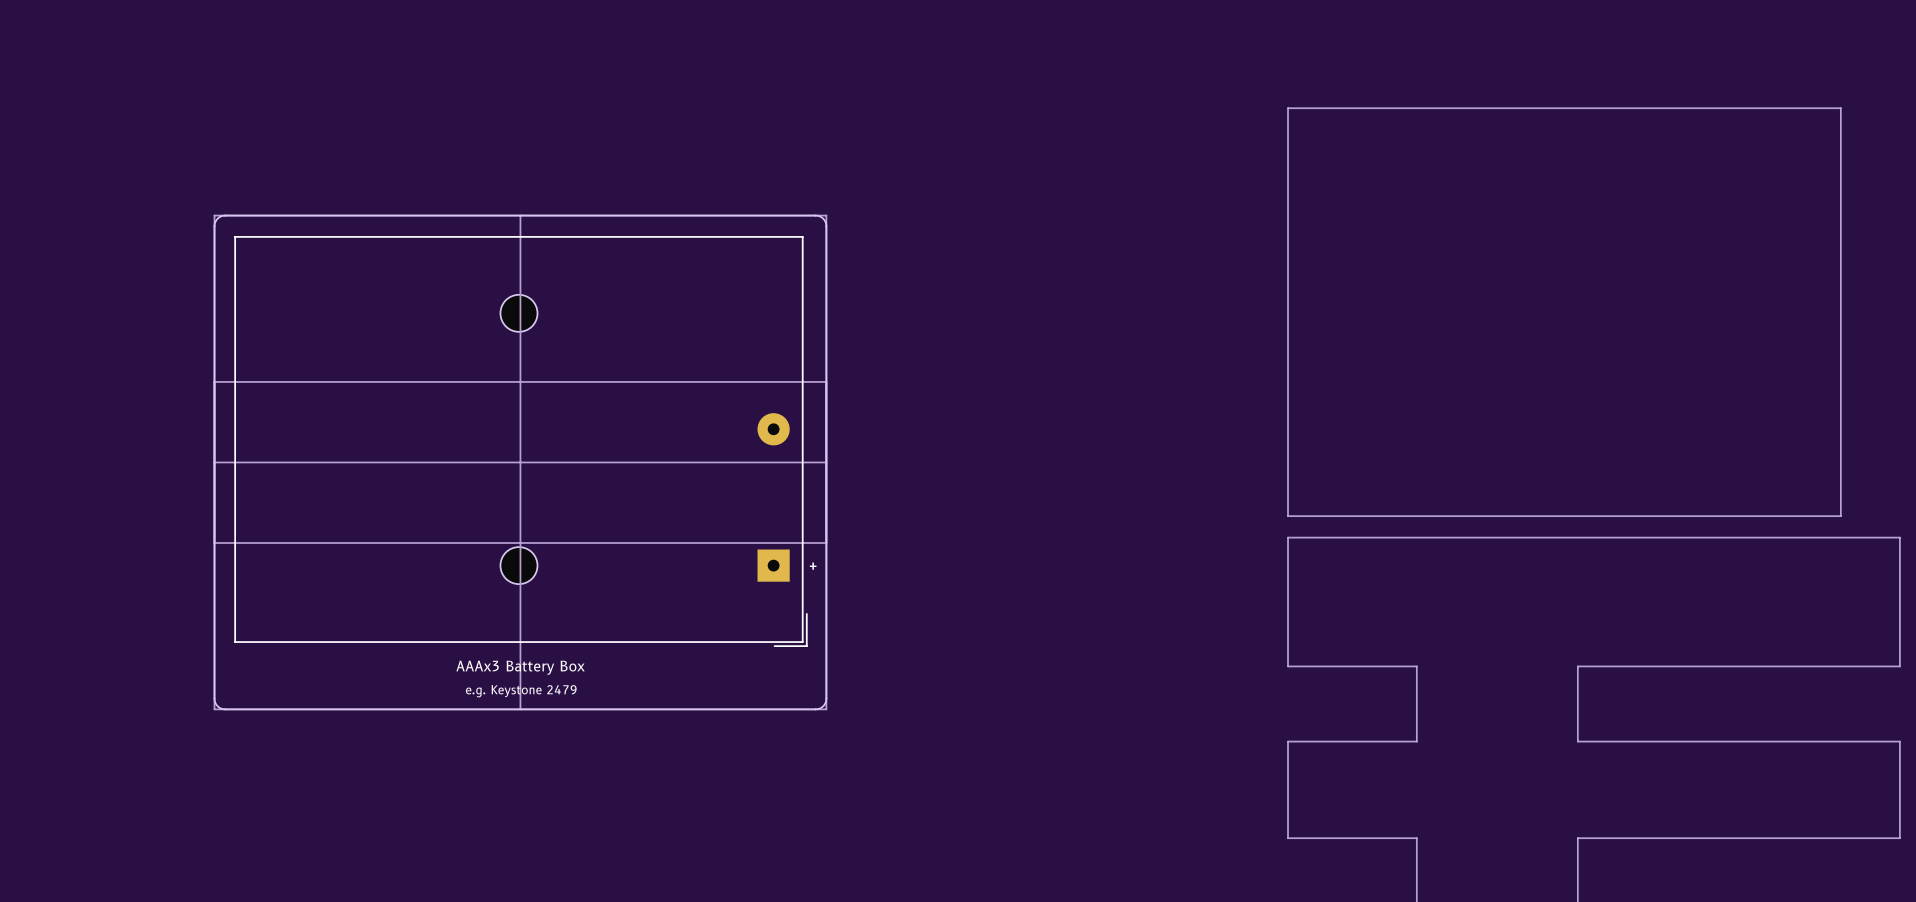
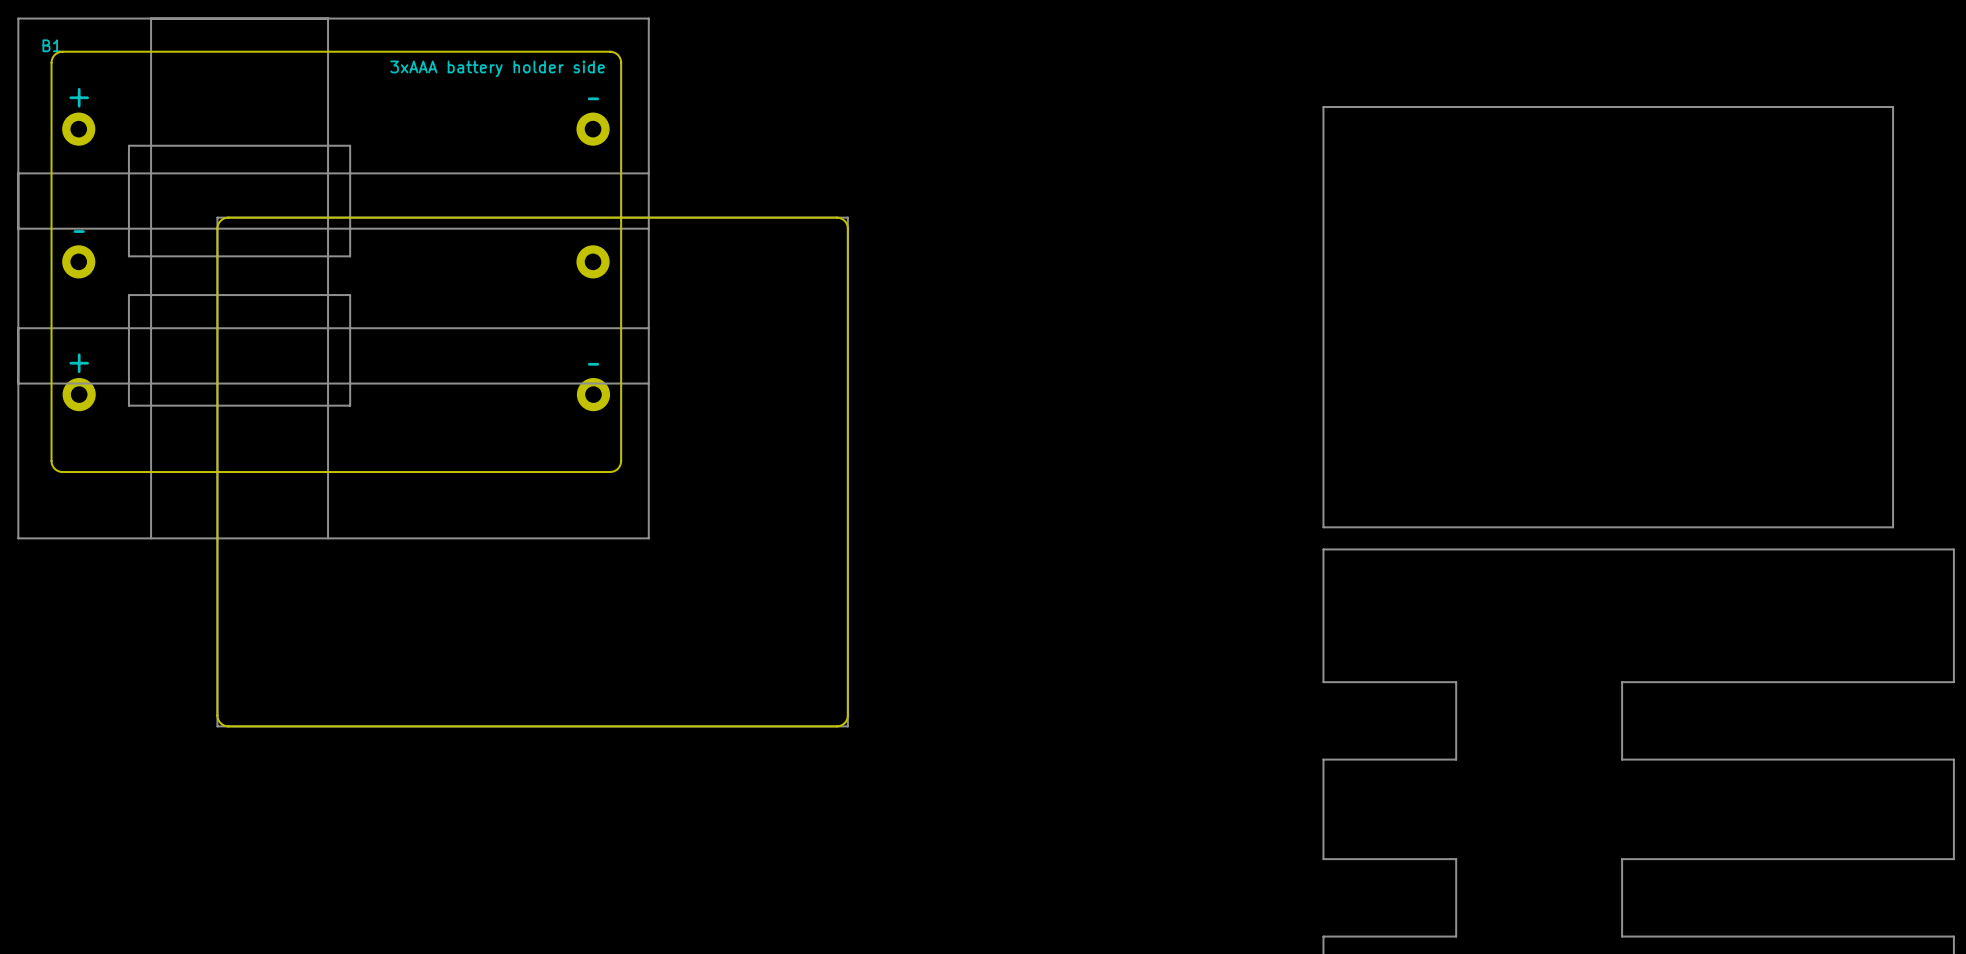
line: none -> (18, 18) (18, 538) (648, 538) (648, 18) (18, 18)
line: none -> (151, 18) (151, 538)
line: none -> (328, 18) (328, 538)
board edge: none -> (62, 51) (610, 51) (616, 54) (621, 62) (621, 460) (618, 467) (610, 472) (62, 472) (55, 469) (51, 460) (51, 62) (54, 54) (62, 51)
text: none -> 3xAAA battery holder side (497, 68)
text: none -> + (79, 97)
text: none -> – (593, 98)
line: none -> (128, 145) (128, 256) (350, 256) (350, 145) (128, 145)
line: none -> (18, 173) (648, 173)
line: (520, 215) (520, 709) -> none
line: none -> (18, 228) (648, 228)
text: none -> – (79, 231)
B1: none -> (336, 261)
line: none -> (128, 295) (128, 405) (350, 405) (350, 295) (128, 295)
line: none -> (18, 328) (648, 328)
text: none -> + (79, 363)
text: none -> – (593, 364)
line: (214, 381) (826, 381) (826, 542) (214, 542) (214, 381) -> none
part: AAAx3 Battery Box (520, 441) -> none
line: (214, 462) (826, 462) -> (18, 383) (648, 383)

